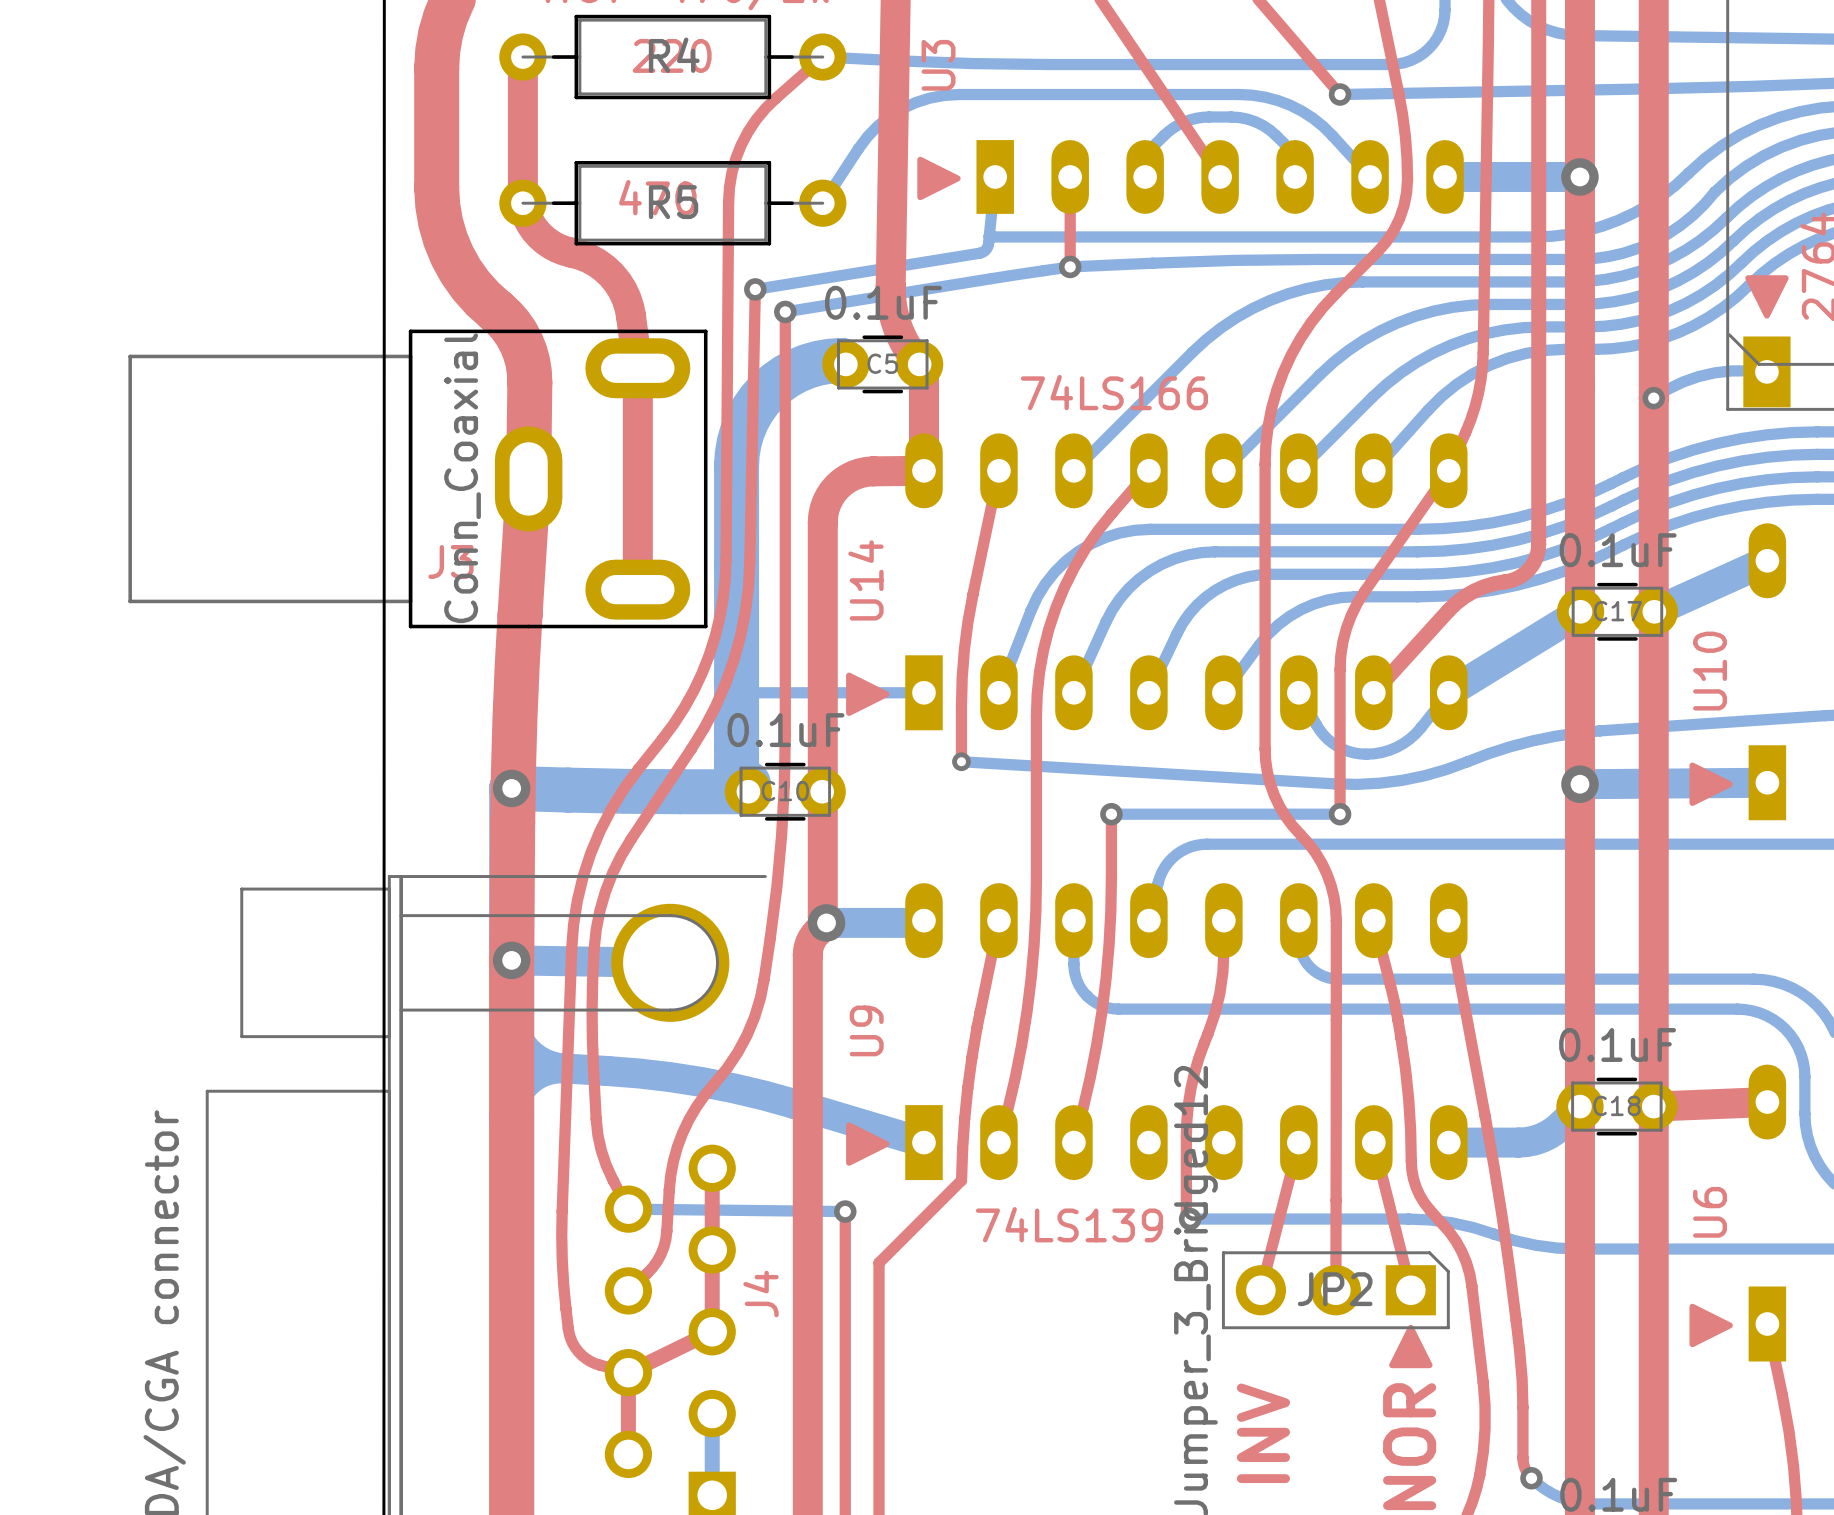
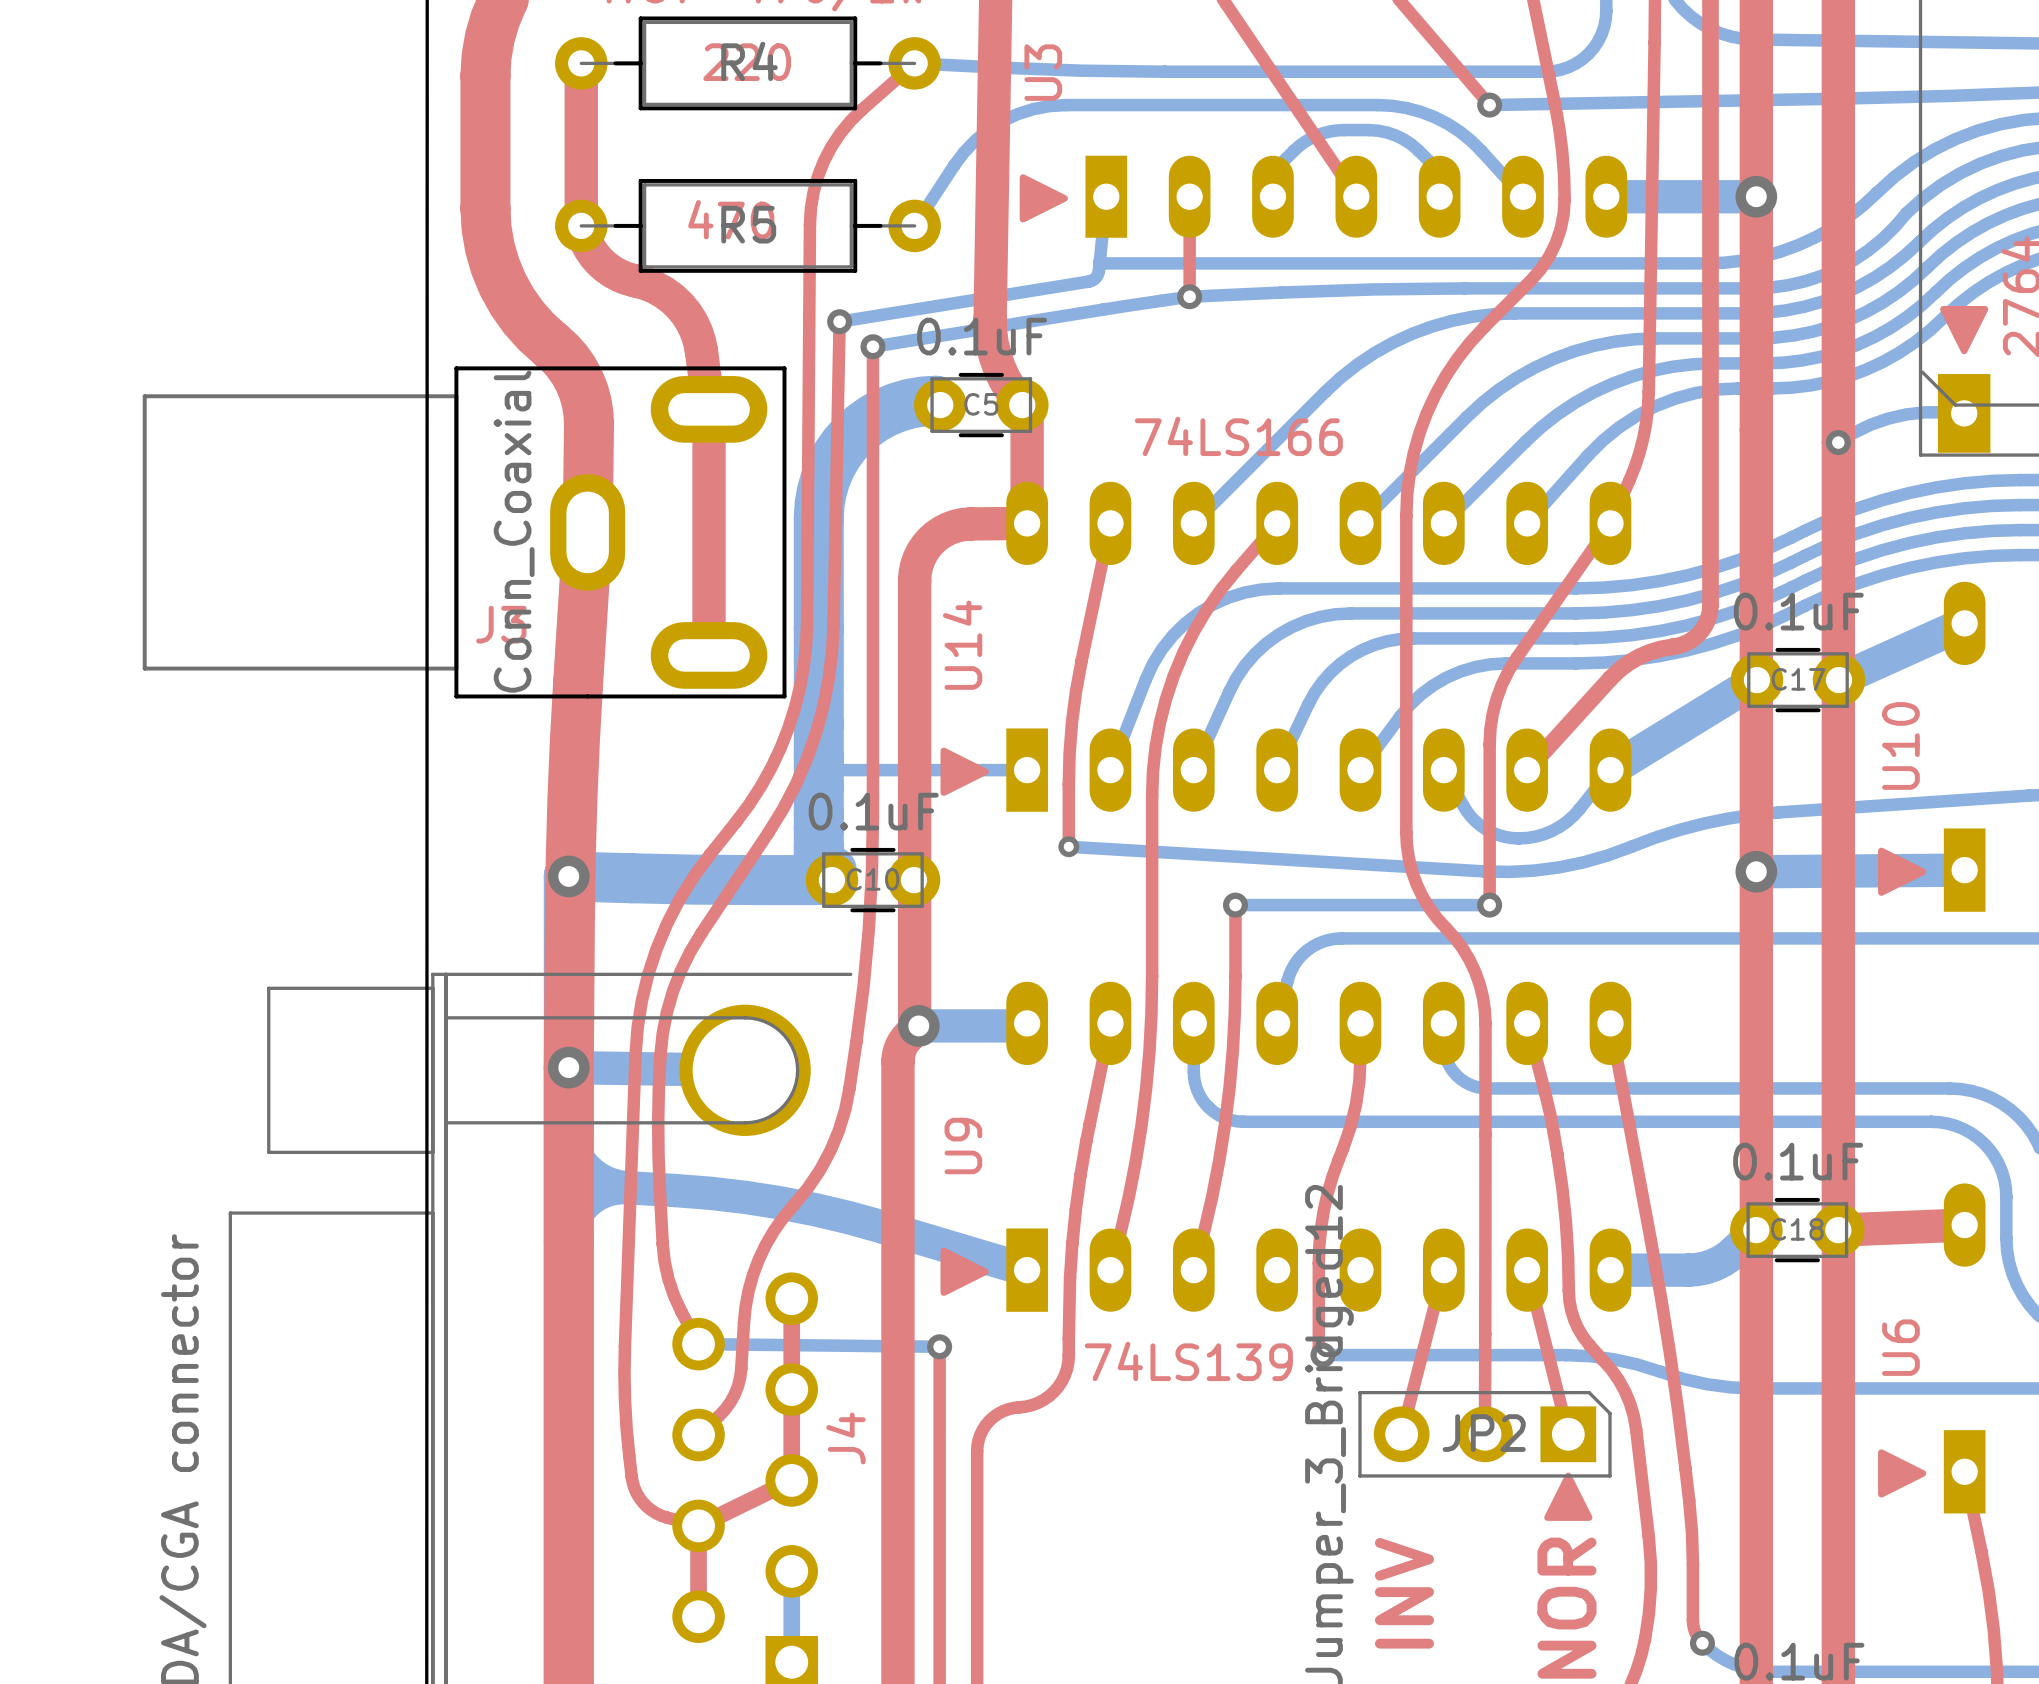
top track: (962, 1149) (961, 1180) (879, 1262) (879, 1305) -> (1070, 1277) (1068, 1362) (1062, 1380) (1049, 1395) (1038, 1402) (1008, 1409) (993, 1417) (982, 1429) (977, 1451)

